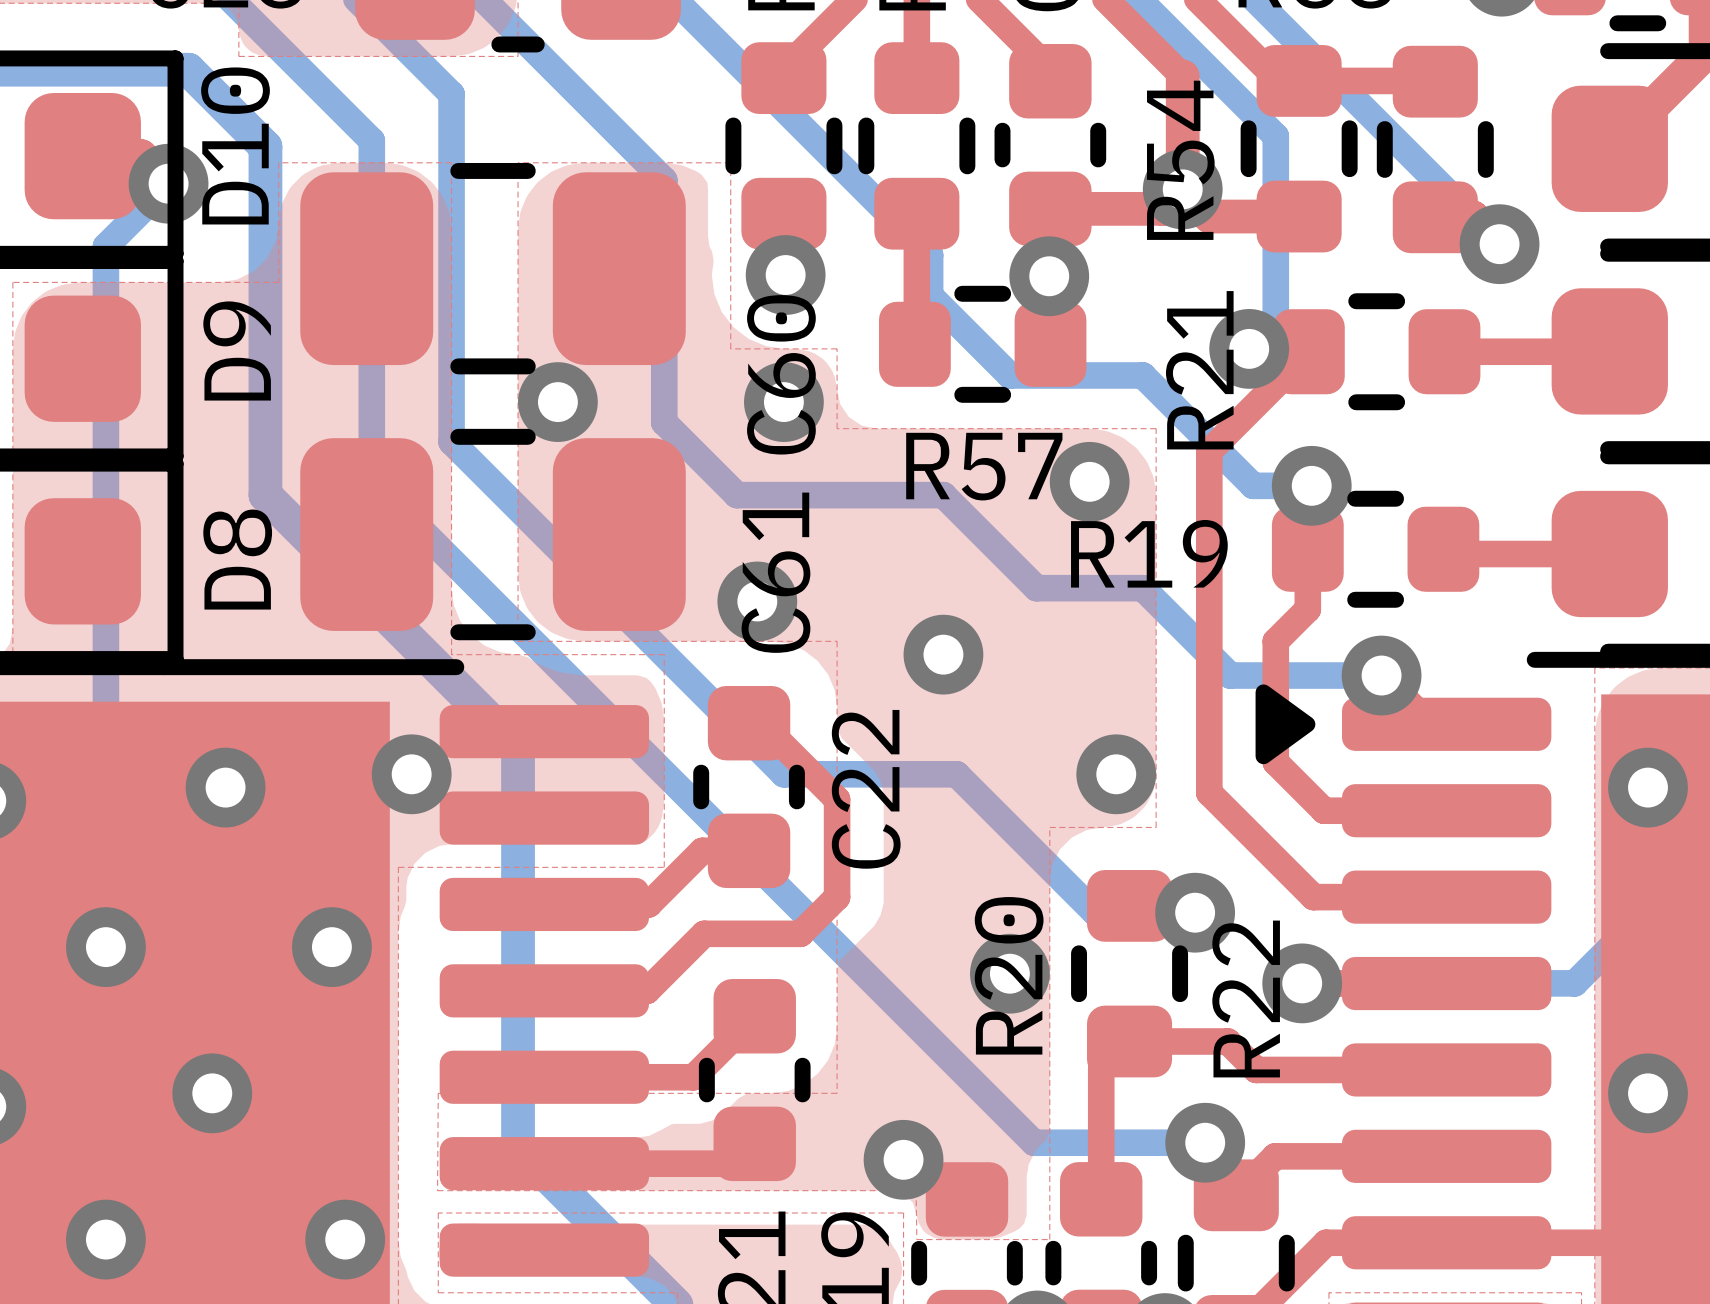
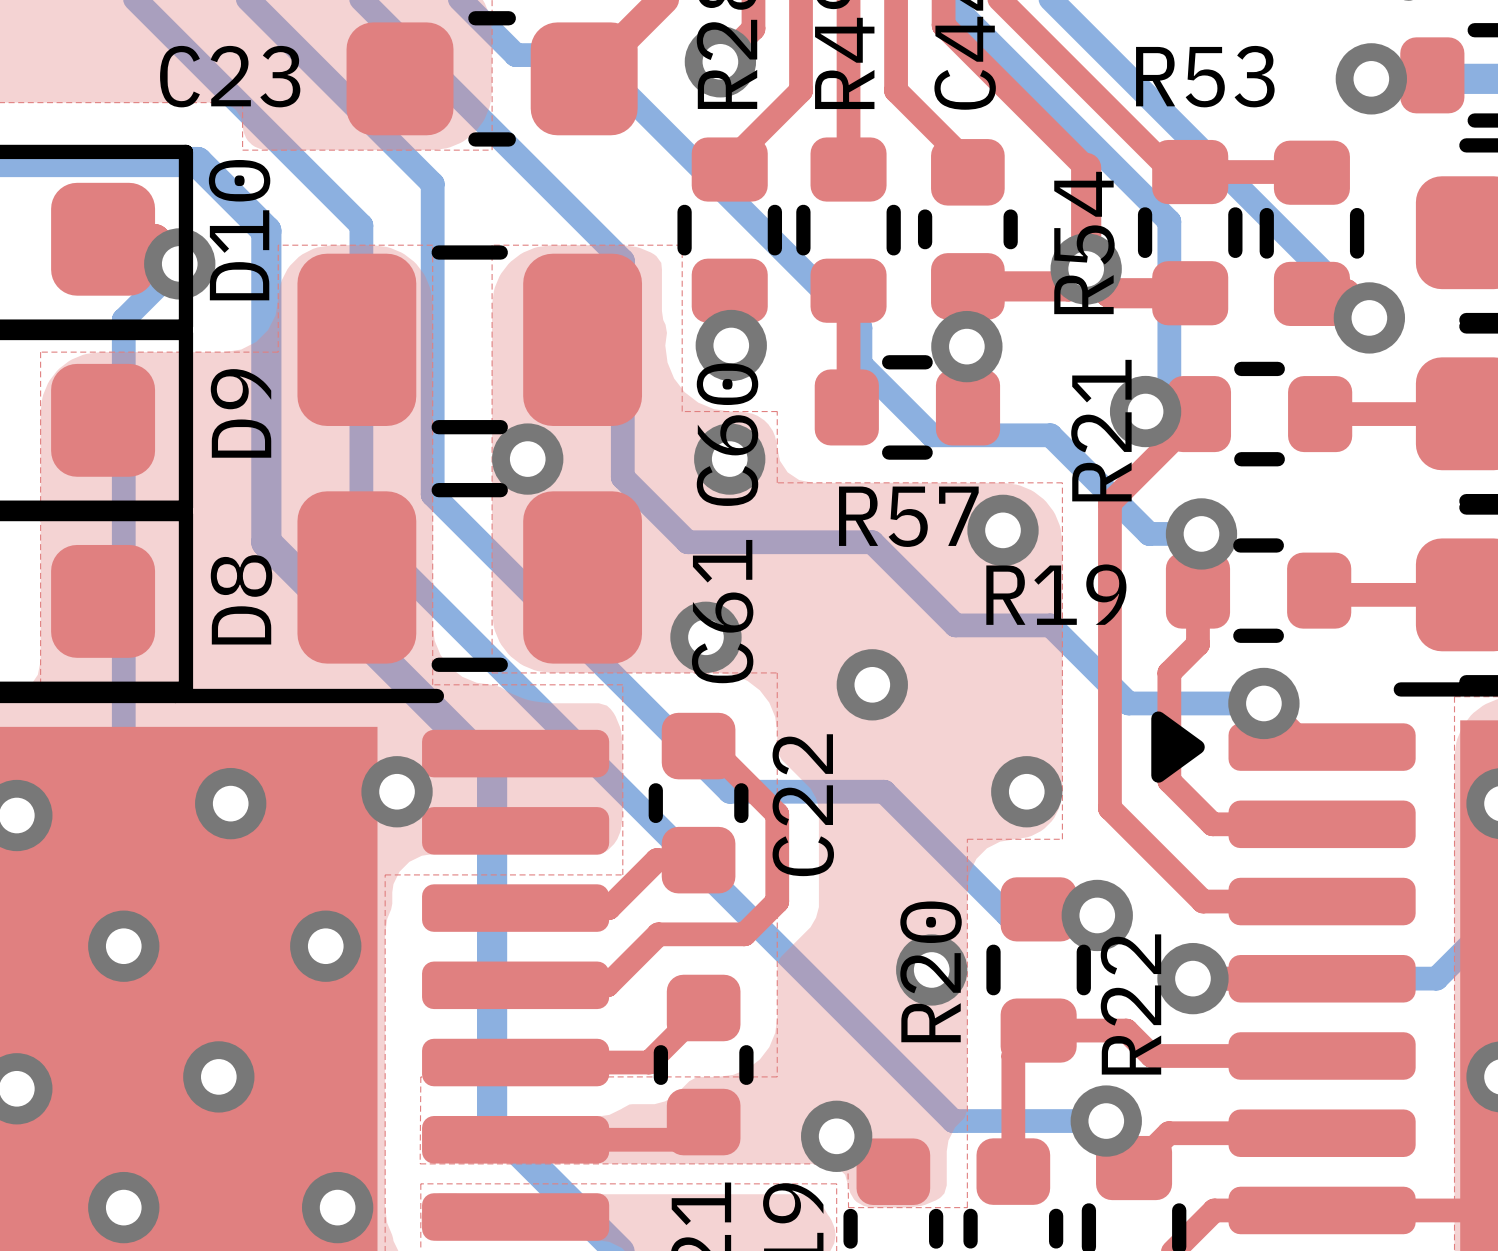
R22 name position: R22 (1246, 999) -> R22 (1130, 1004)

